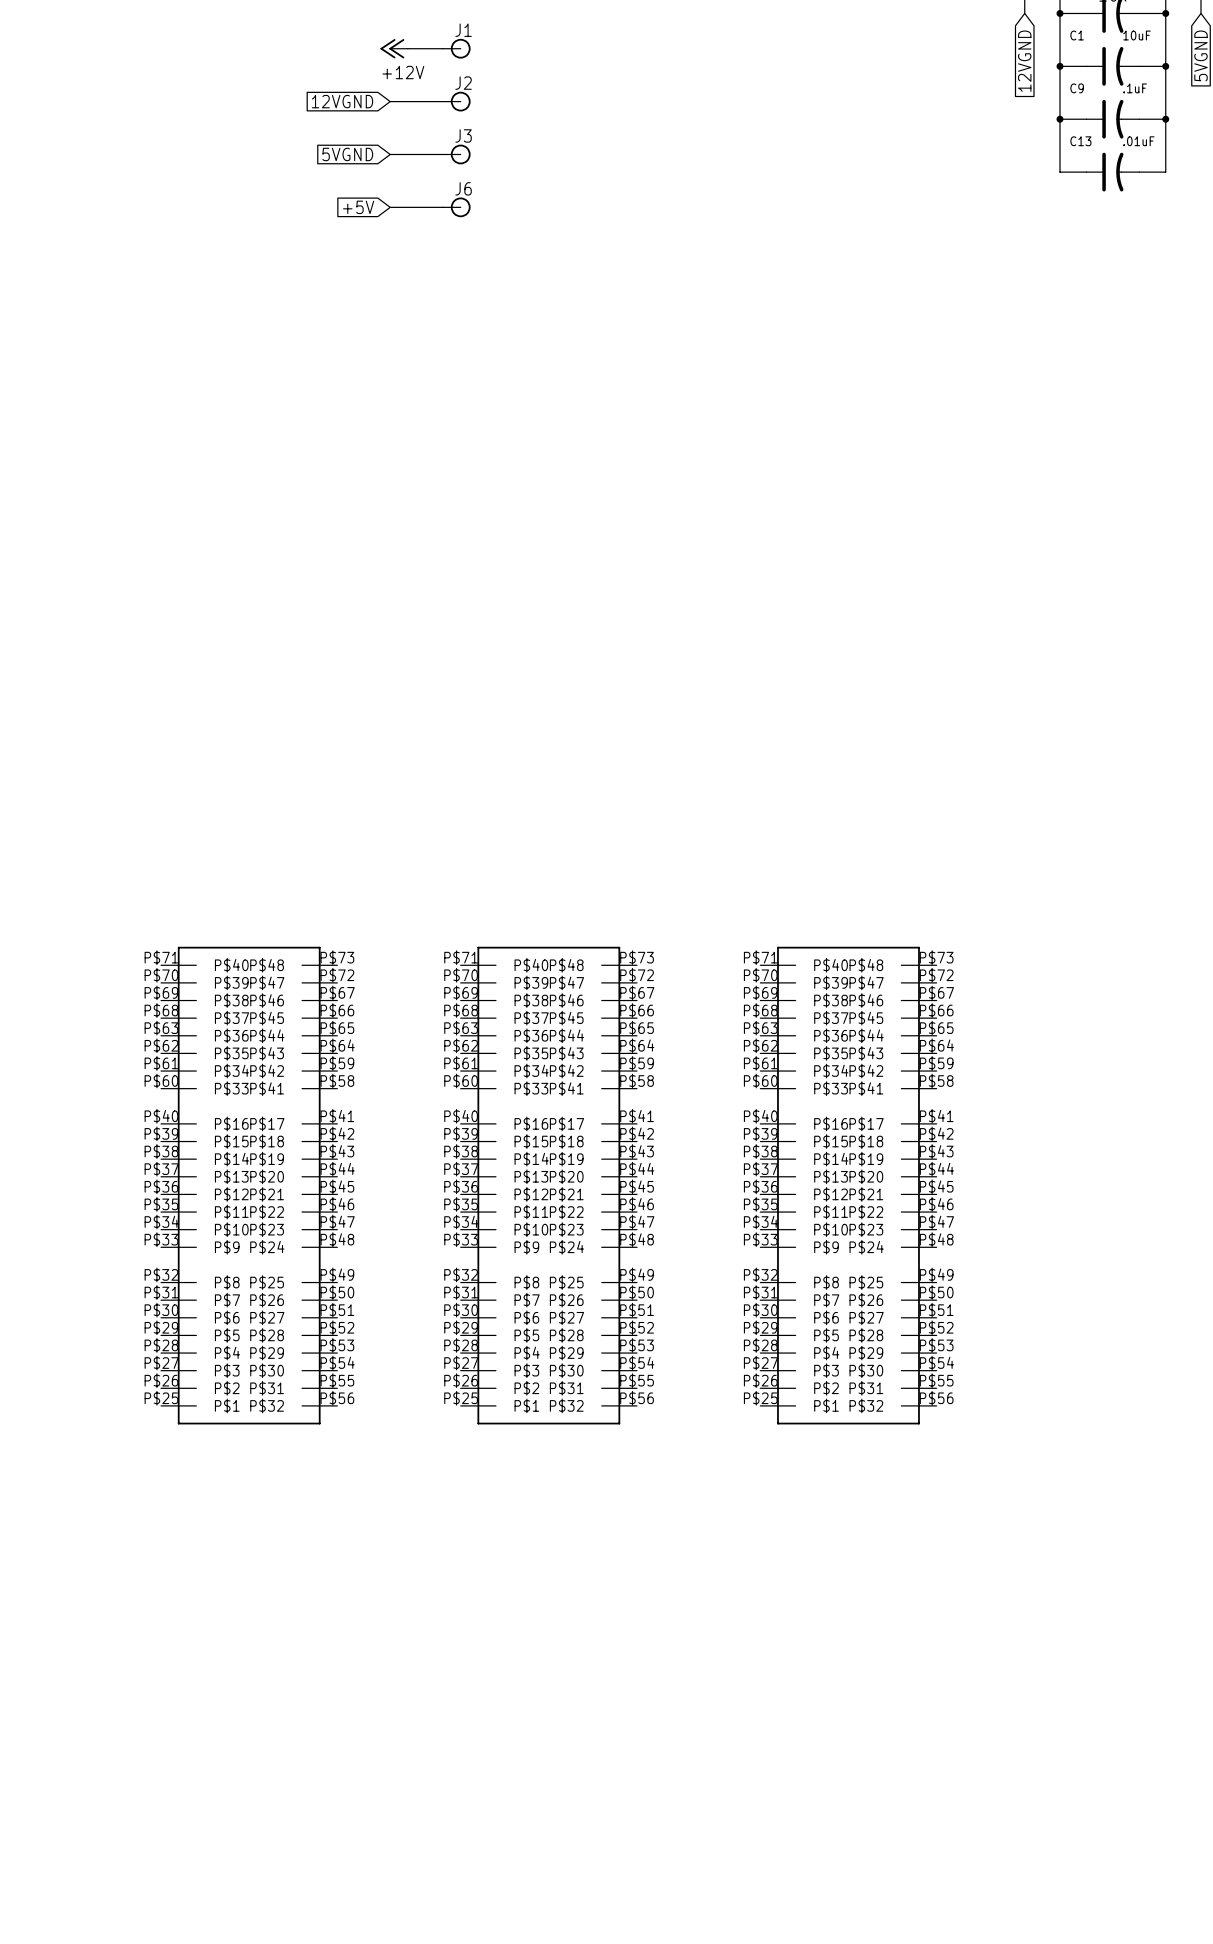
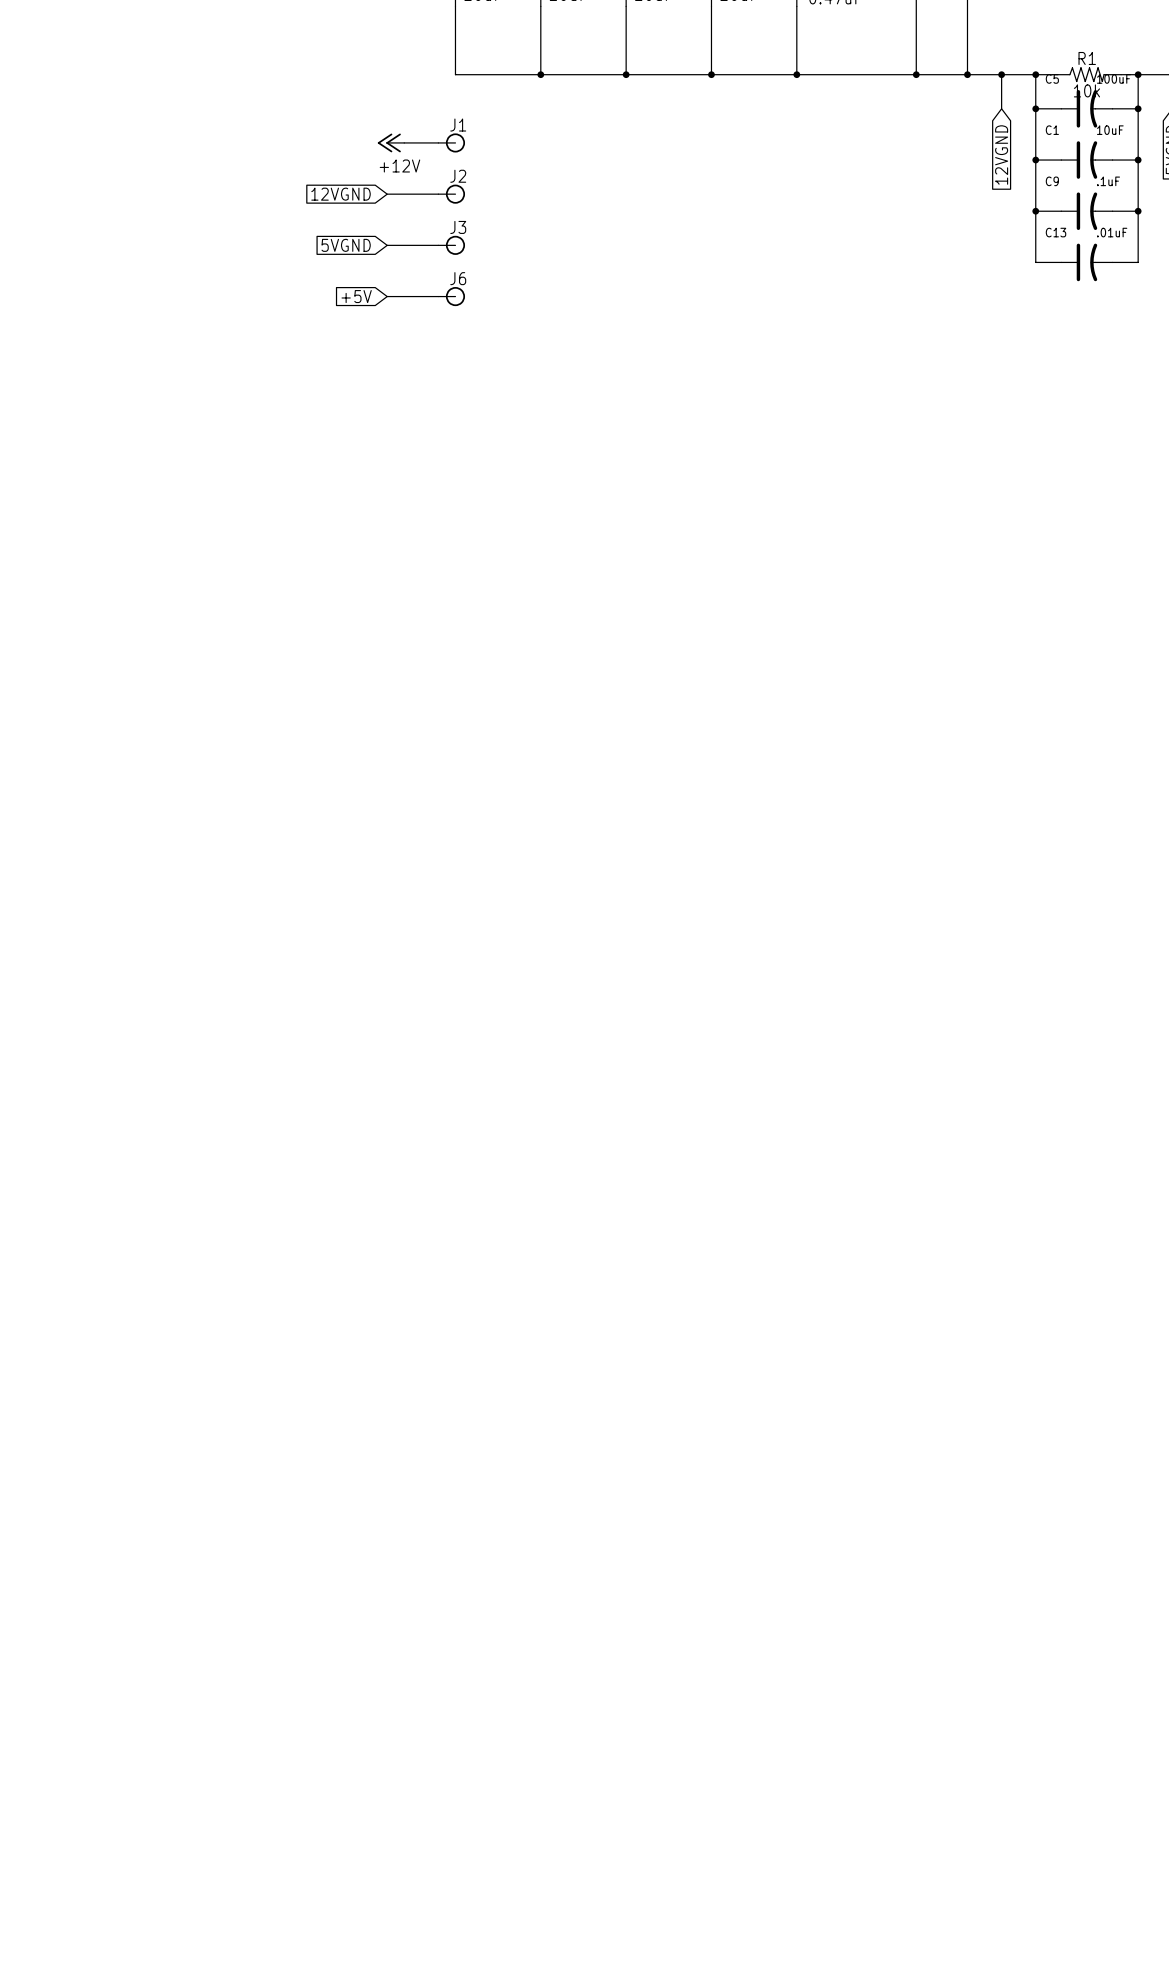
part: (249, 1185) -> none
part: (548, 1185) -> none
part: (848, 1185) -> none

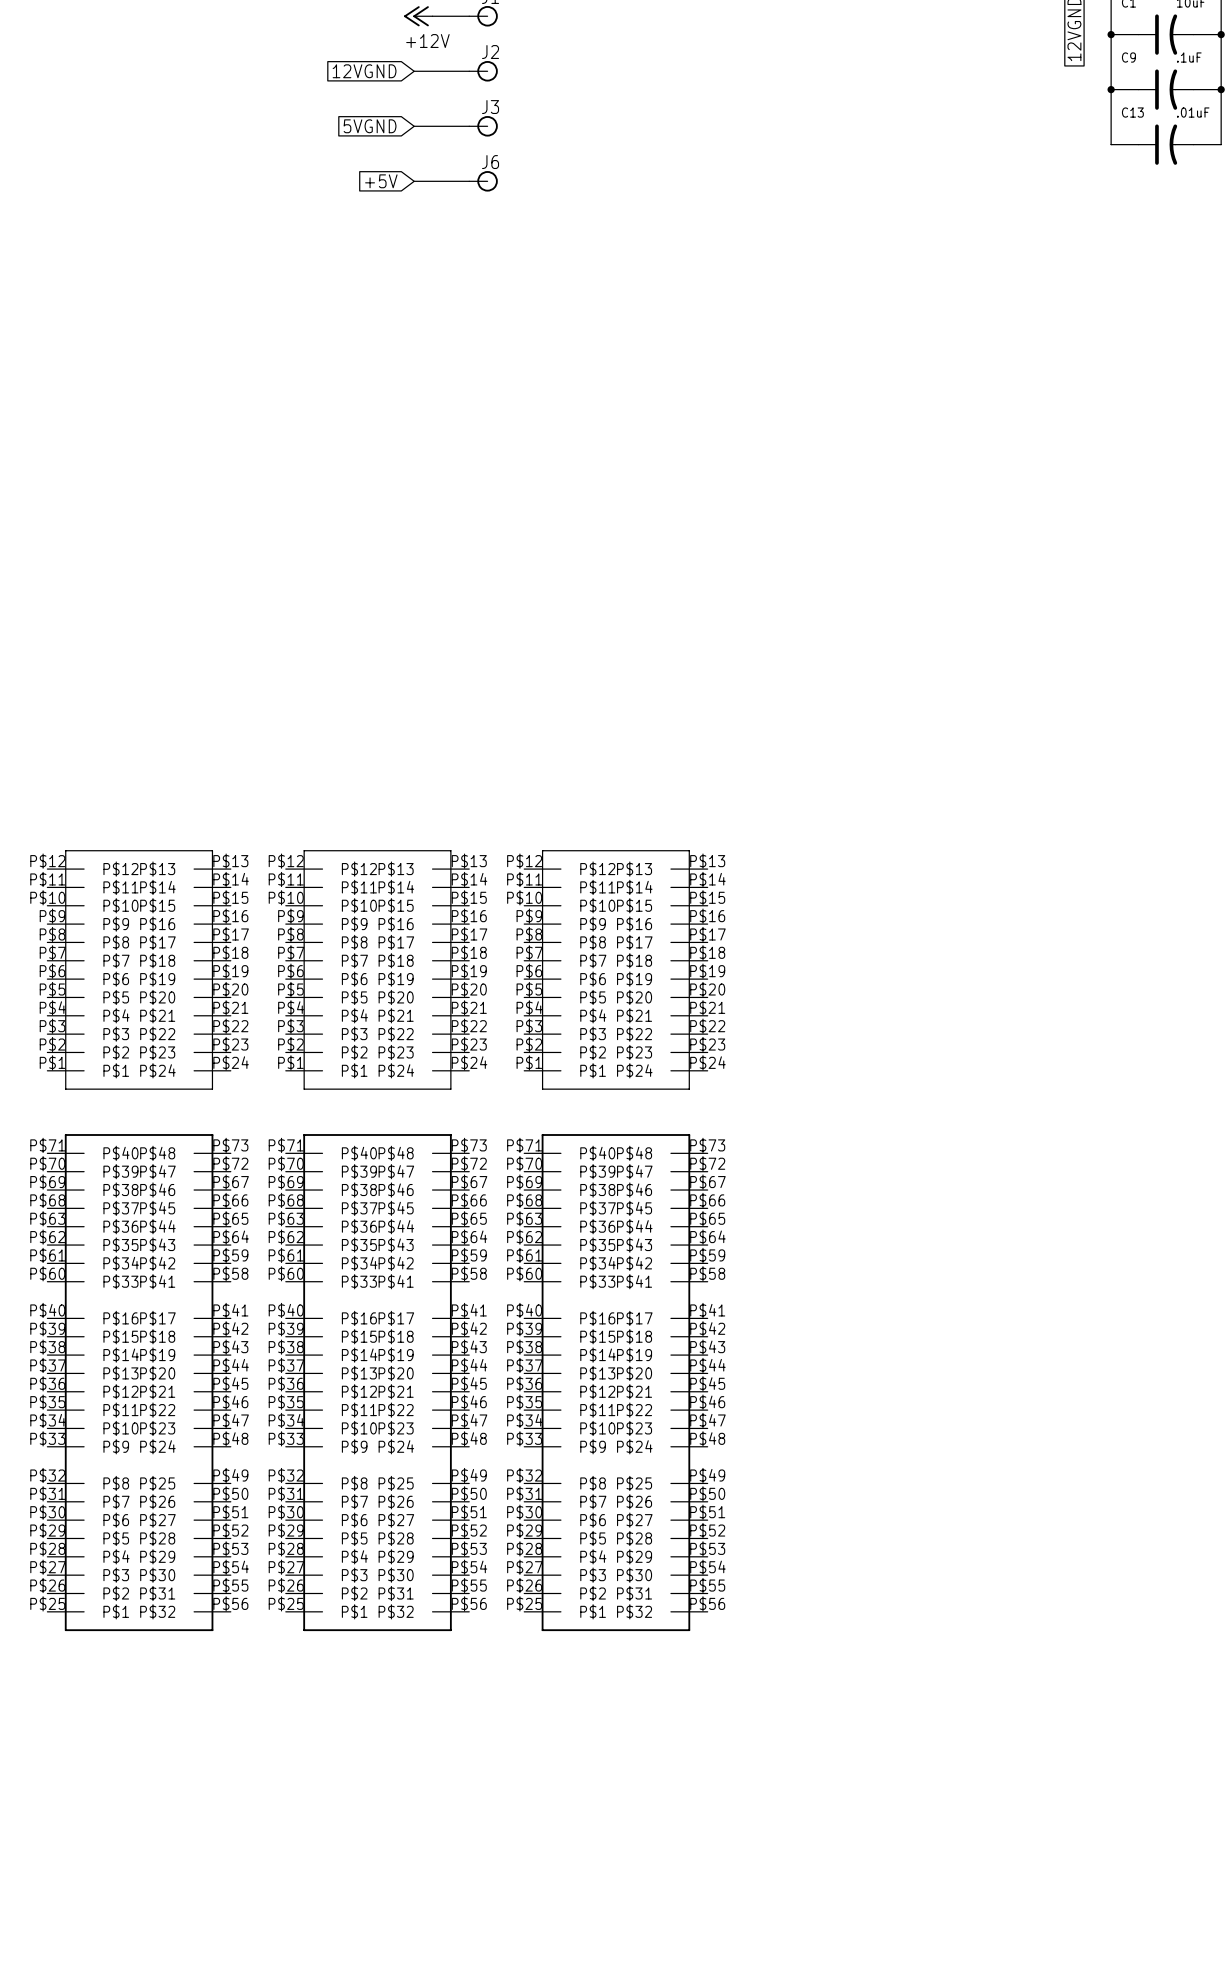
part: none -> (139, 969)
part: none -> (377, 969)
part: none -> (615, 969)
part: none -> (139, 1382)
part: none -> (377, 1382)
part: none -> (615, 1382)

